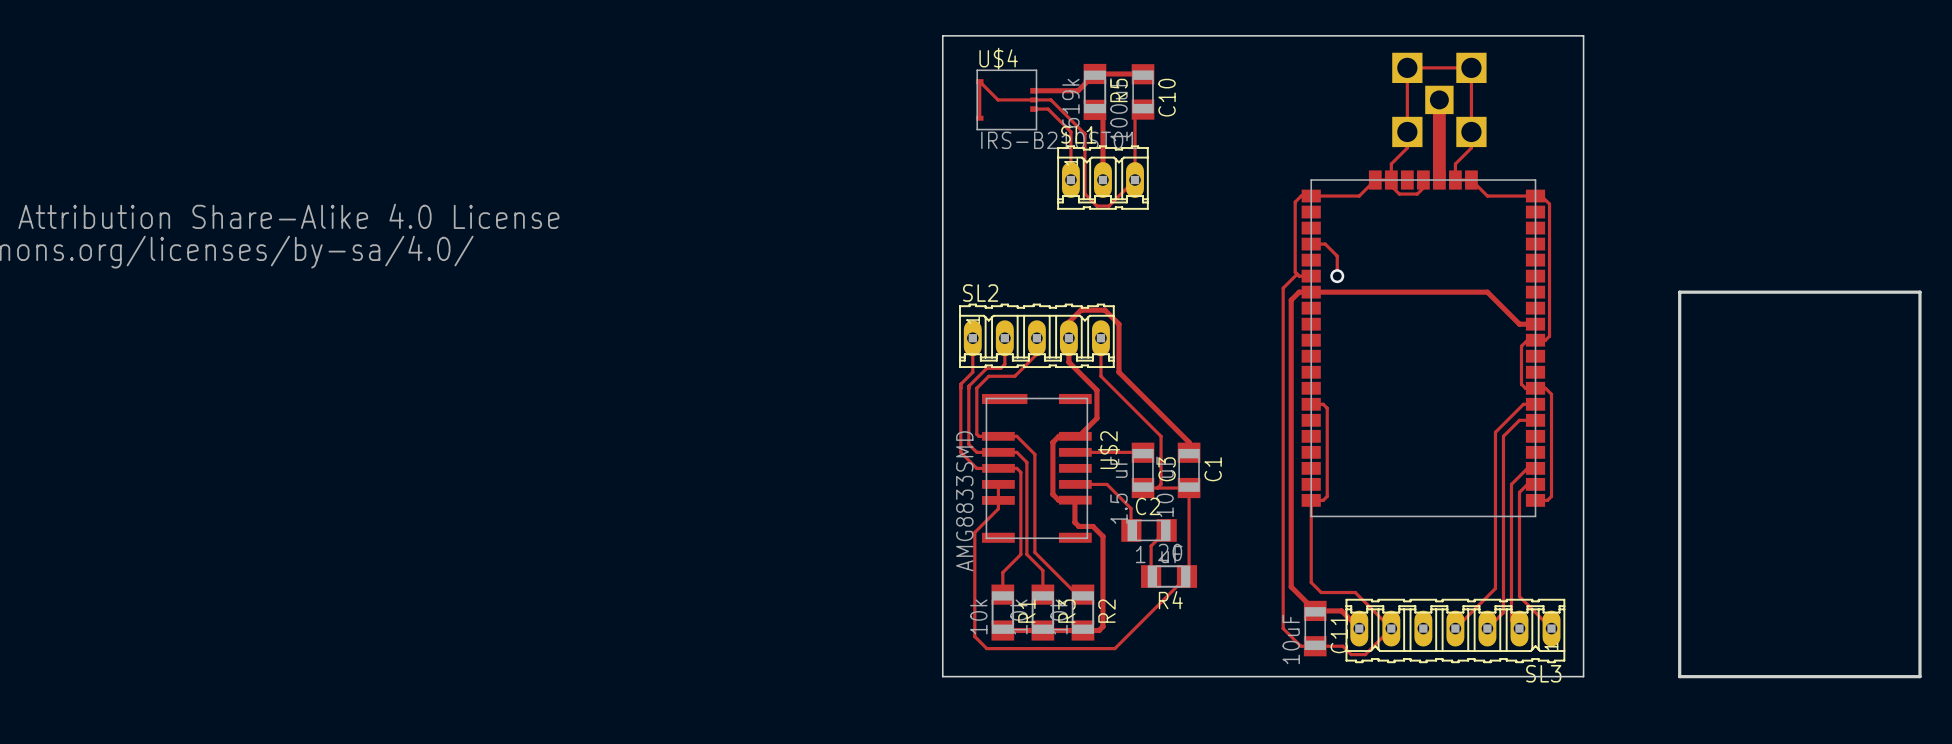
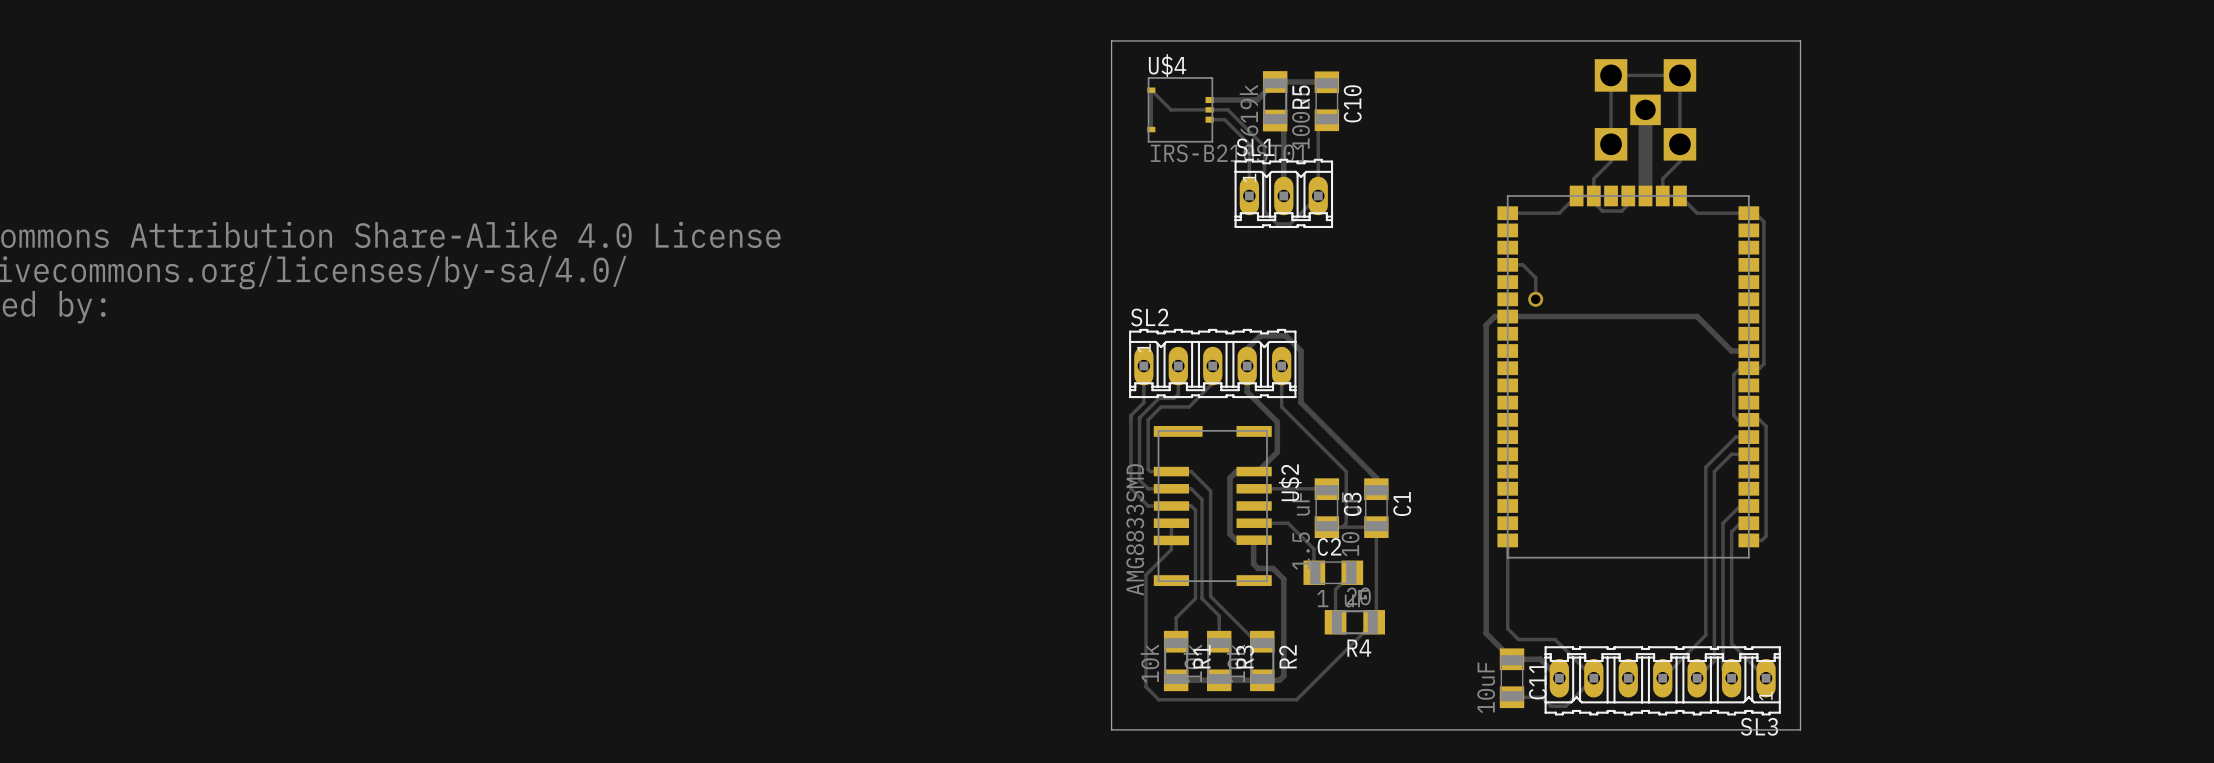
track: (1311, 196) (1301, 196) (1295, 202) (1295, 272) (1299, 276) (1311, 276) -> none
track: (1297, 274) (1283, 288) (1283, 628) (1300, 646) (1315, 646) -> none
board edge: (1679, 292) (1679, 676) (1919, 676) (1919, 292) (1679, 292) -> none
track: (1311, 404) (1323, 404) (1327, 408) (1327, 496) (1323, 500) (1311, 500) -> none

